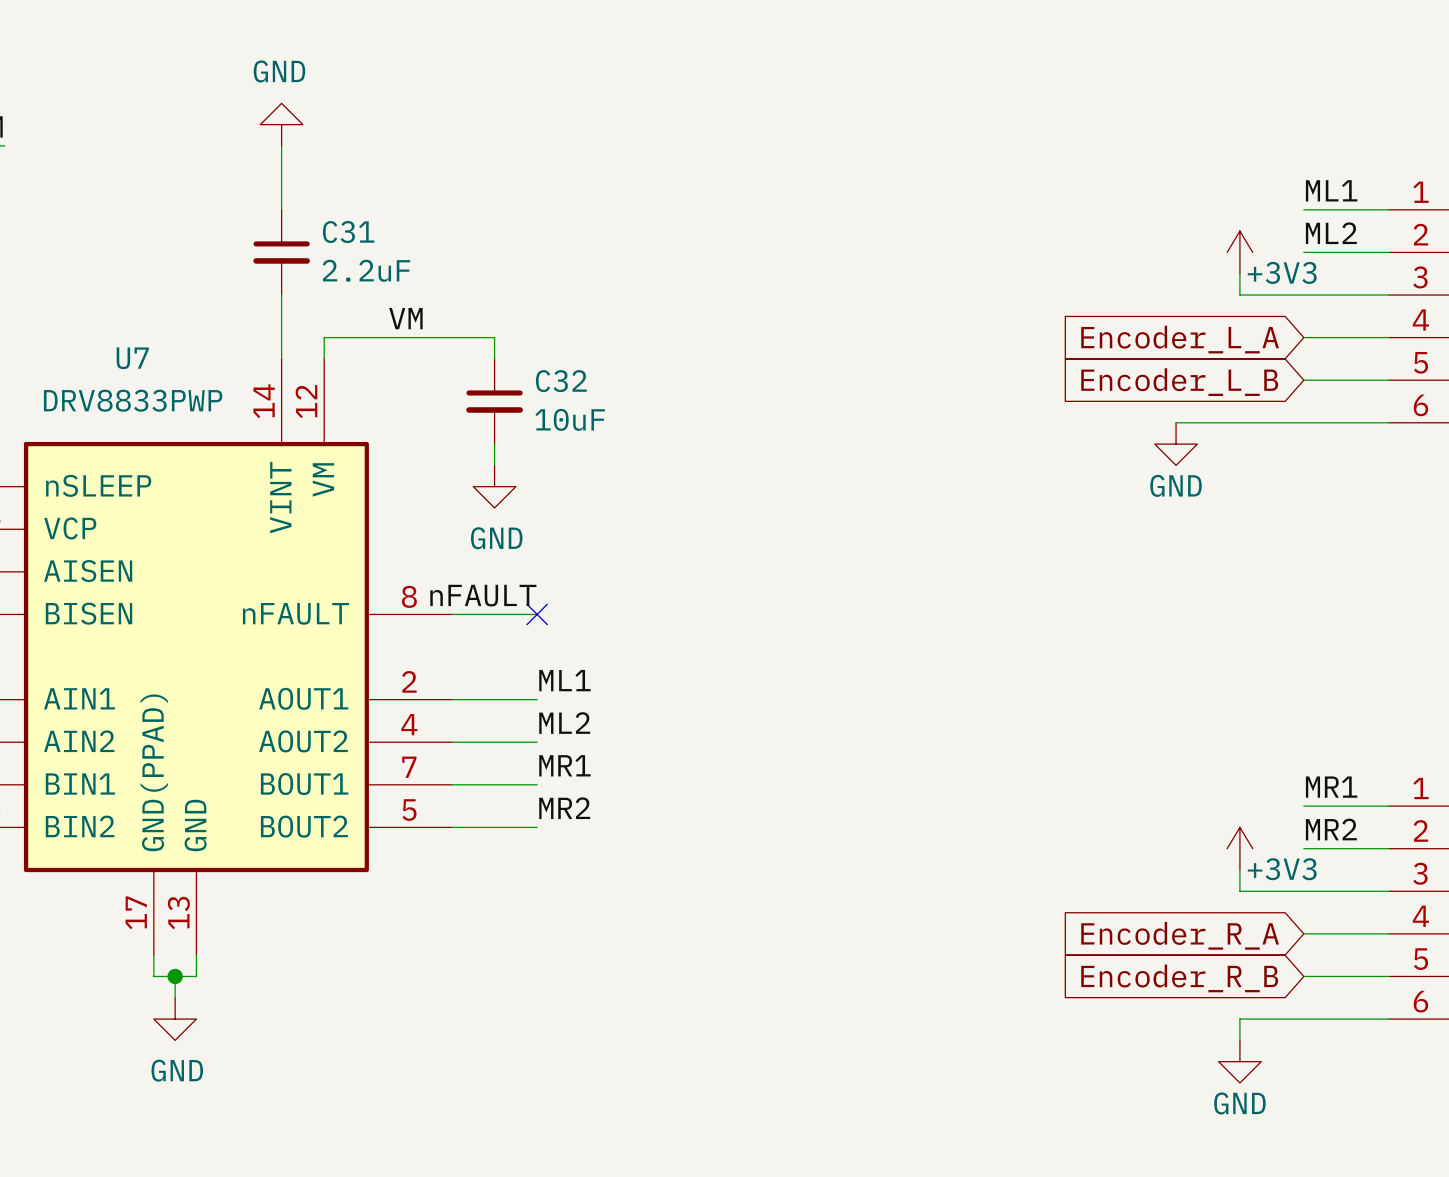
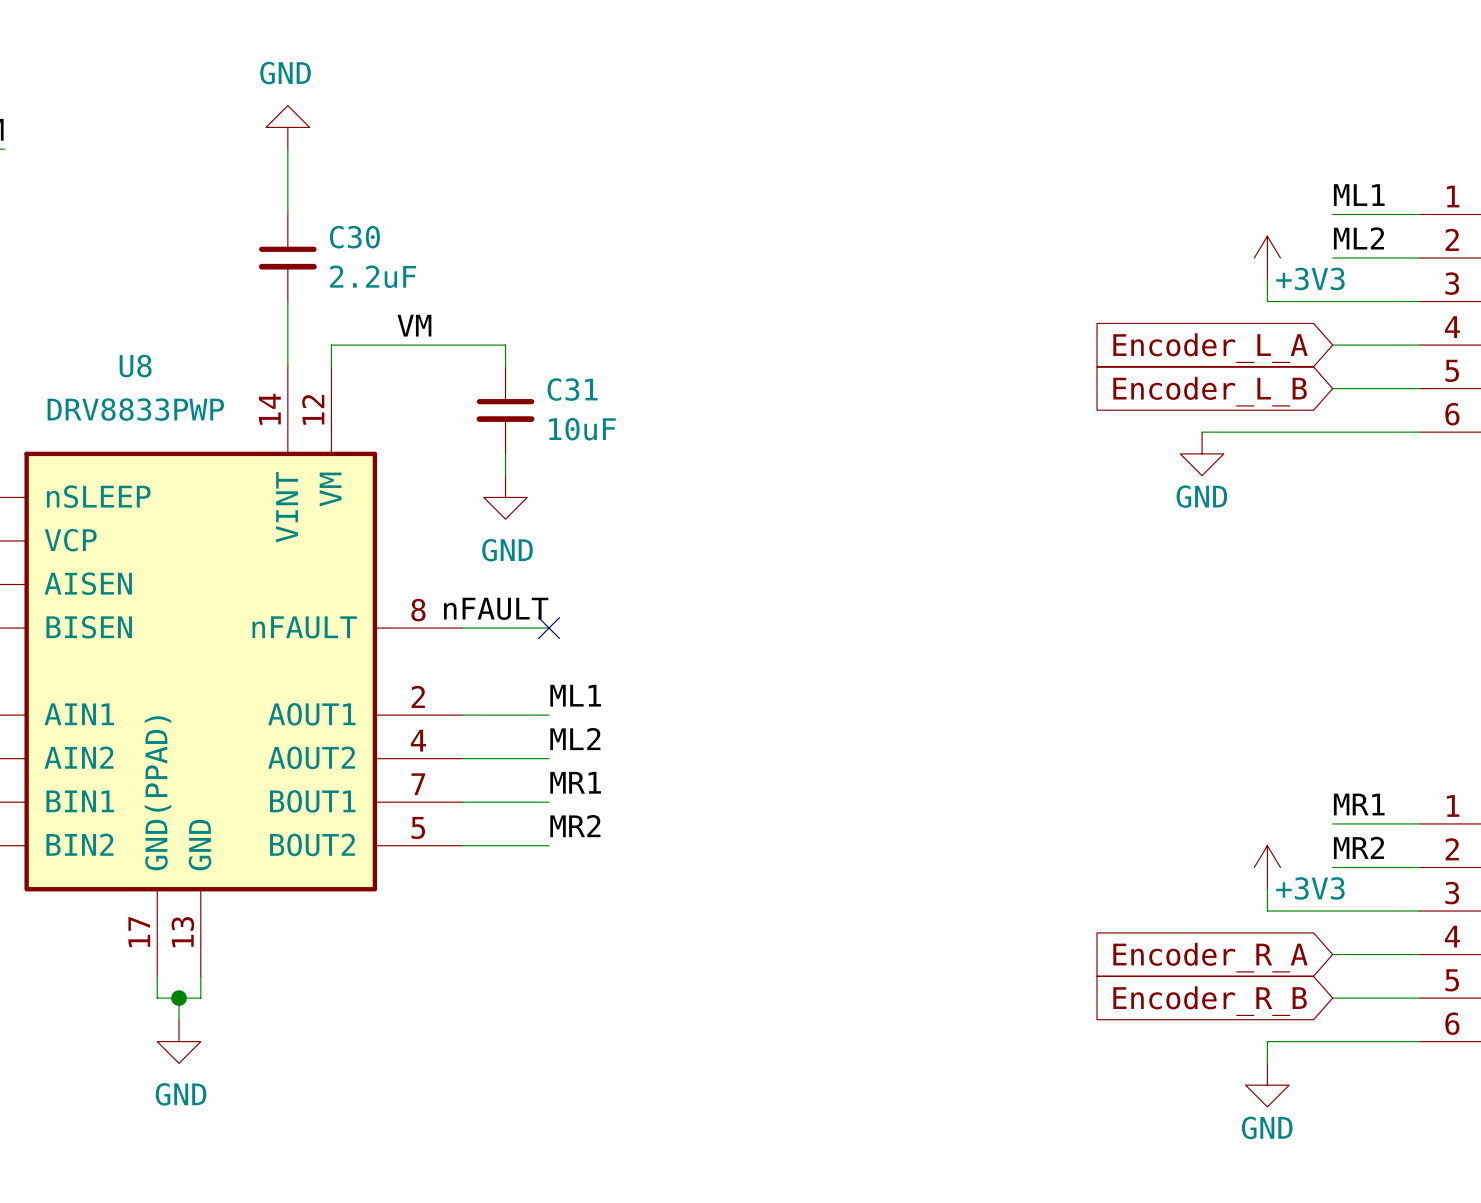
C31 name: C31 (348, 232) -> C30 (354, 237)
U7 name: U7 (132, 358) -> U8 (135, 366)
C32 name: C32 (561, 381) -> C31 (572, 389)

